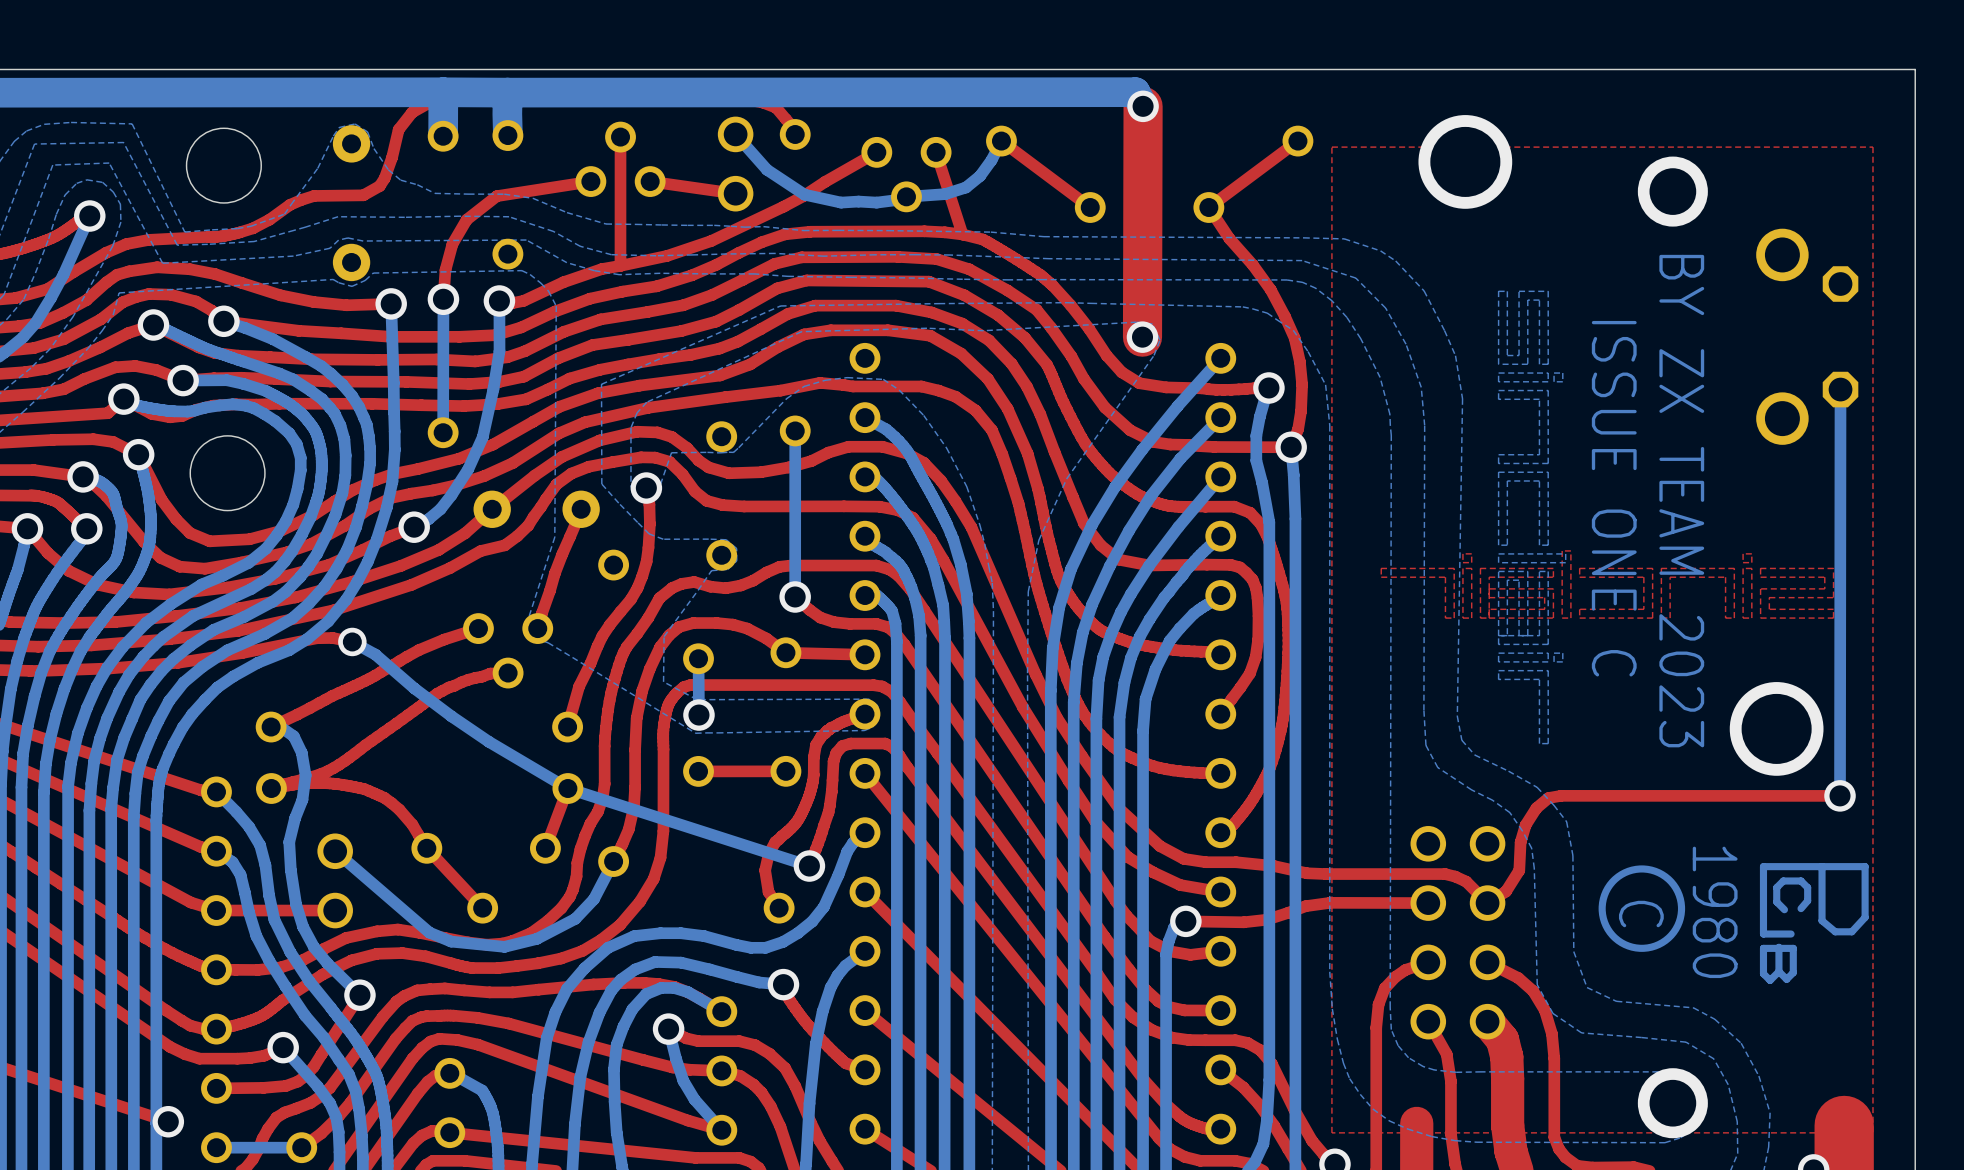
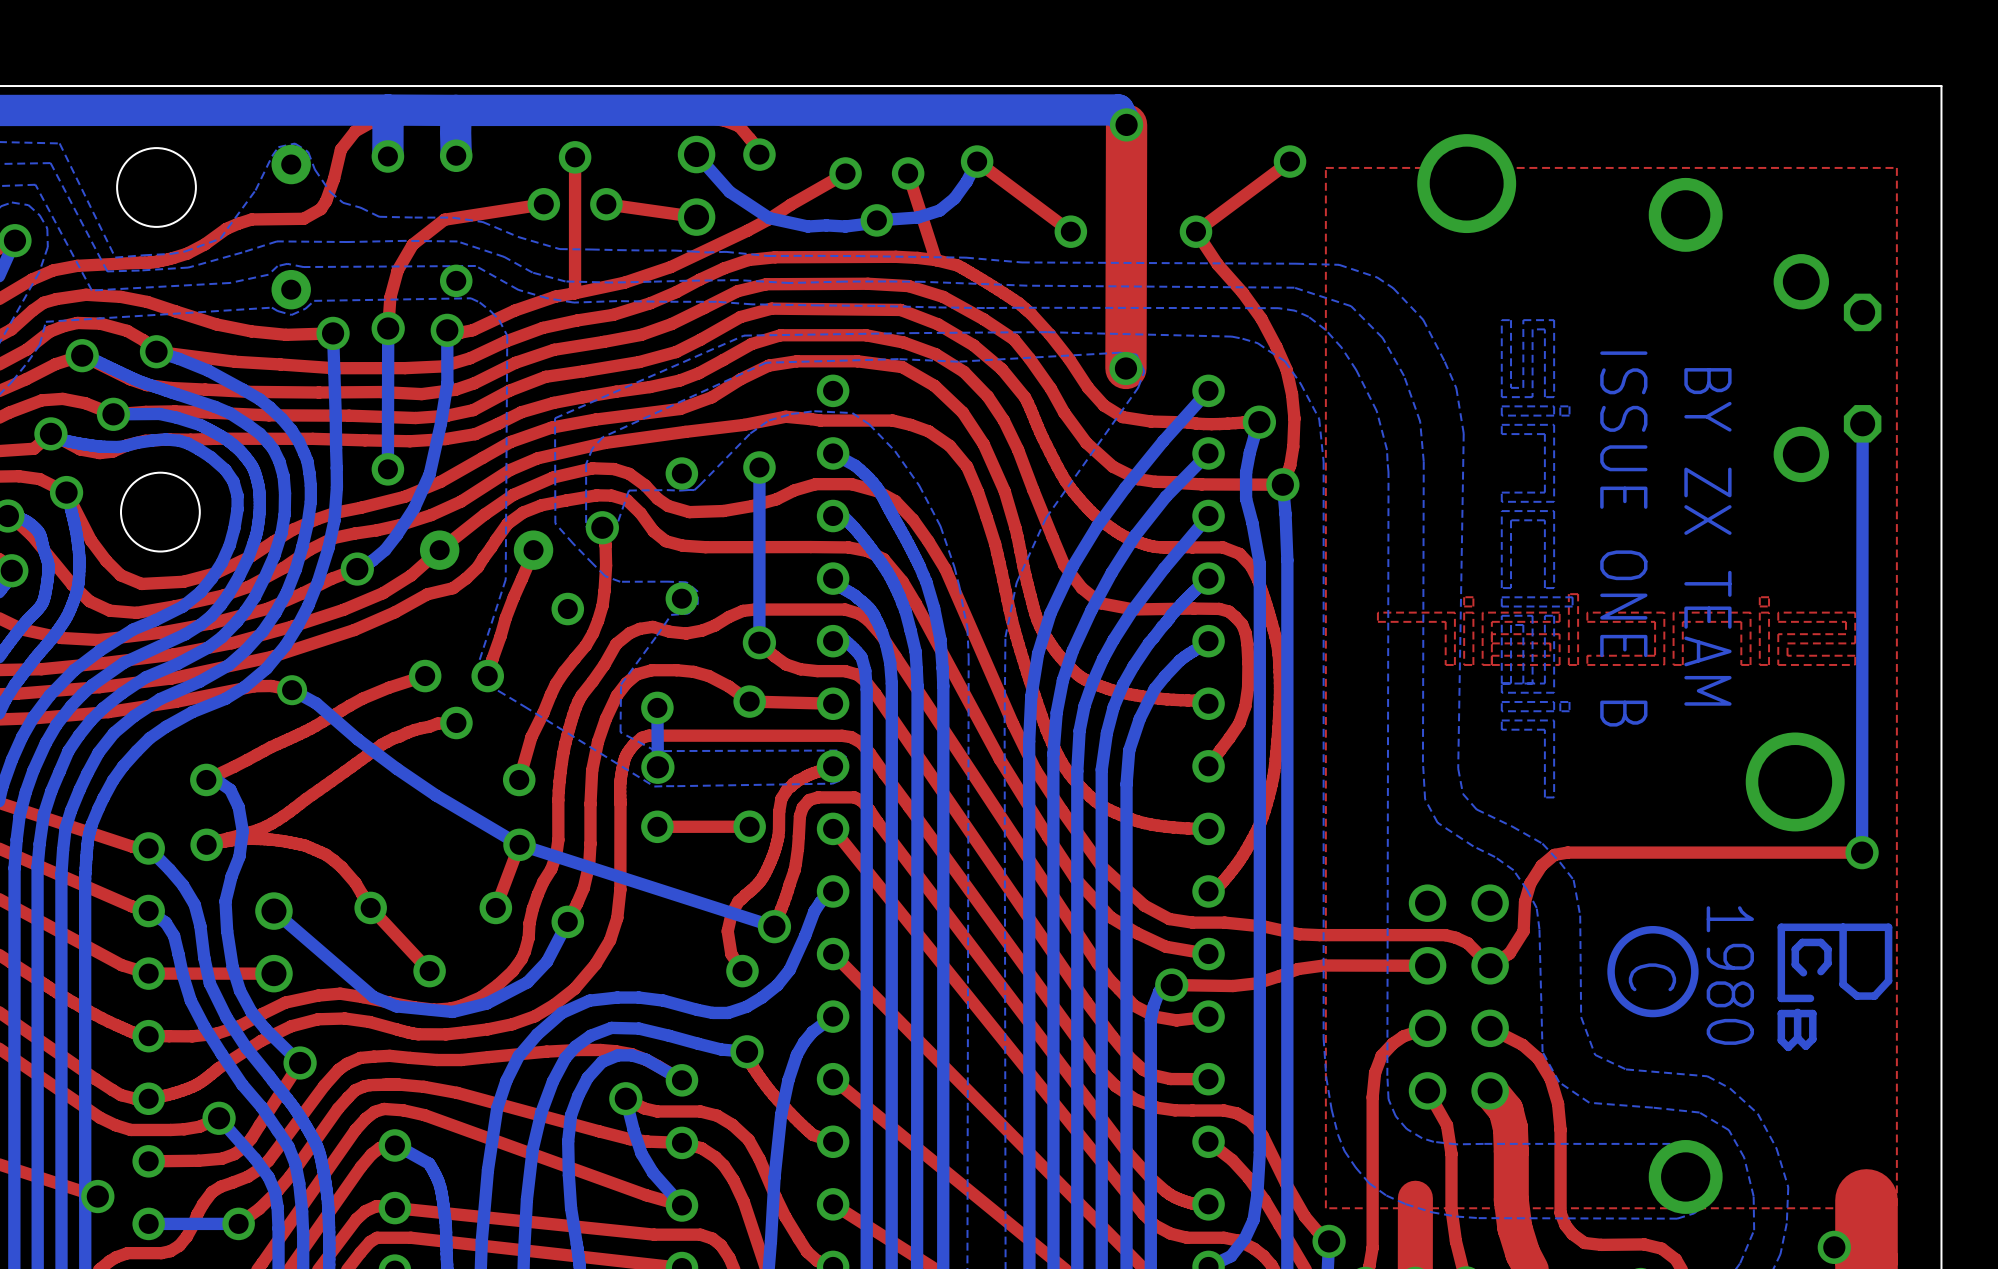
text: ISSUE ONE C (1614, 498) -> ISSUE ONE B (1623, 538)
text: BY ZX TEAM 2023 (1681, 501) -> BY ZX TEAM (1707, 536)

